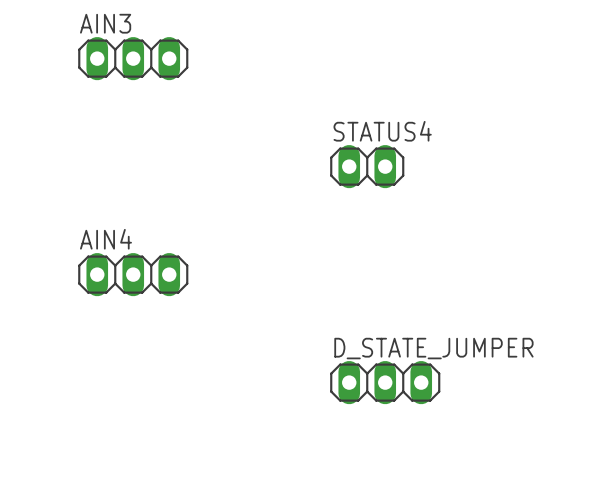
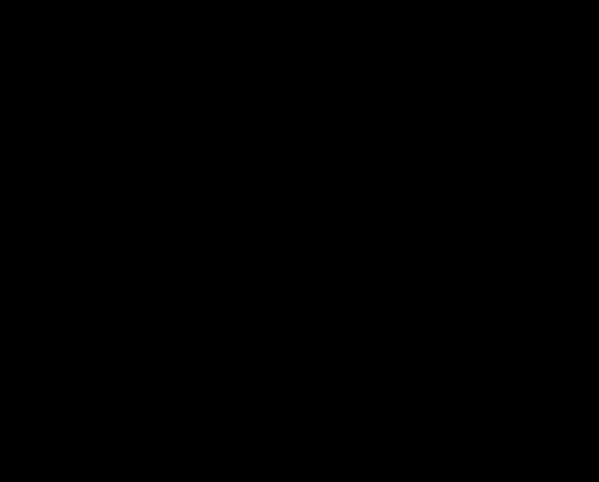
AIN3: (133, 58) -> none
STATUS4: (367, 166) -> none
AIN4: (133, 274) -> none
D_STATE_JUMPER: (385, 382) -> none

